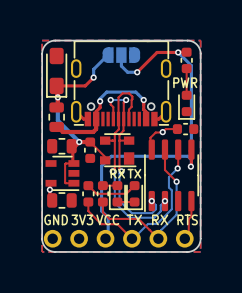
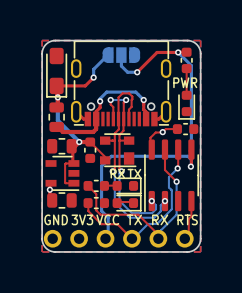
top track: (88, 185) (96, 193) (126, 193) (134, 185) -> (88, 185) (96, 194) (96, 210) (100, 214) (138, 214) (161, 237)
part: none -> (96, 185)
part: none -> (127, 185)
part: (88, 193) -> none
part: (102, 193) -> none
part: (117, 195) -> none
part: (134, 195) -> none
top track: (102, 202) (102, 212) (109, 218) (138, 218) (158, 238) -> none
part: none -> (96, 203)
part: none -> (127, 203)

